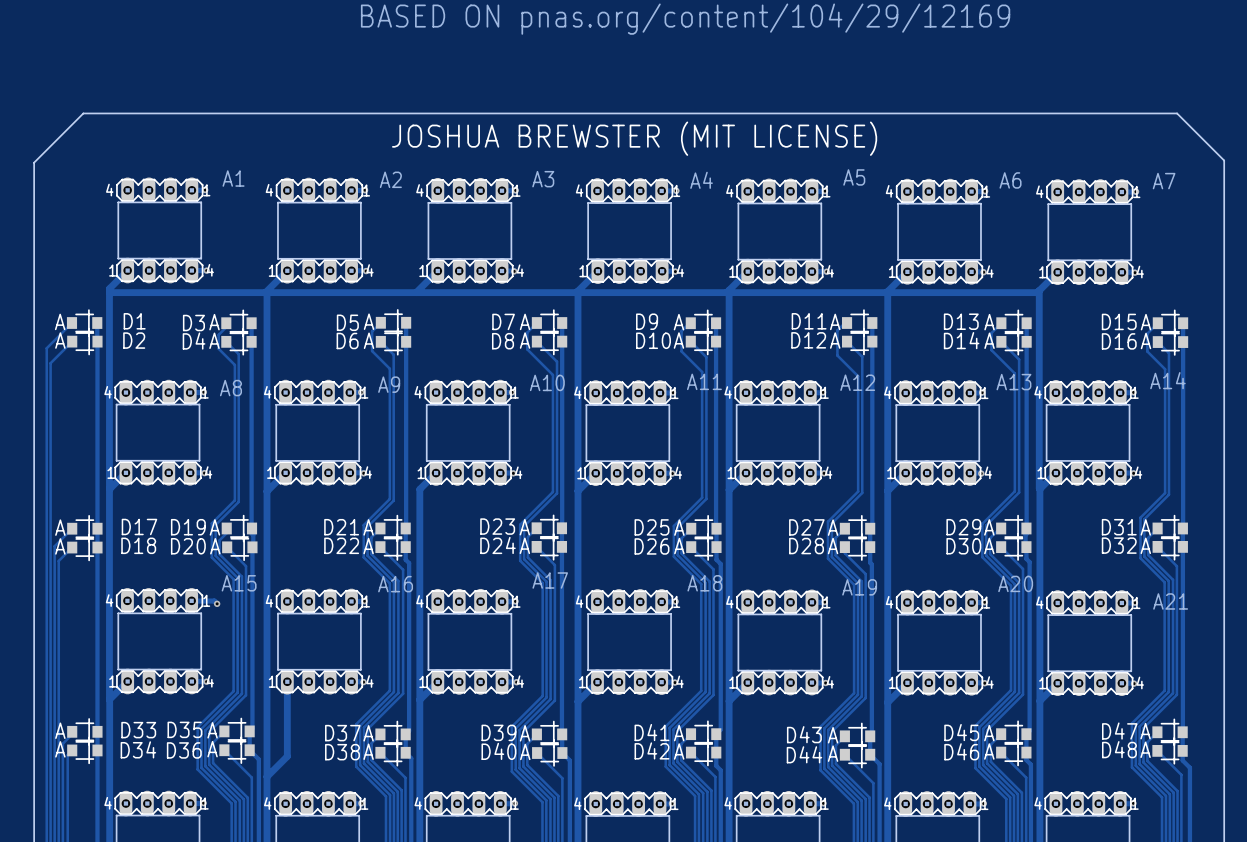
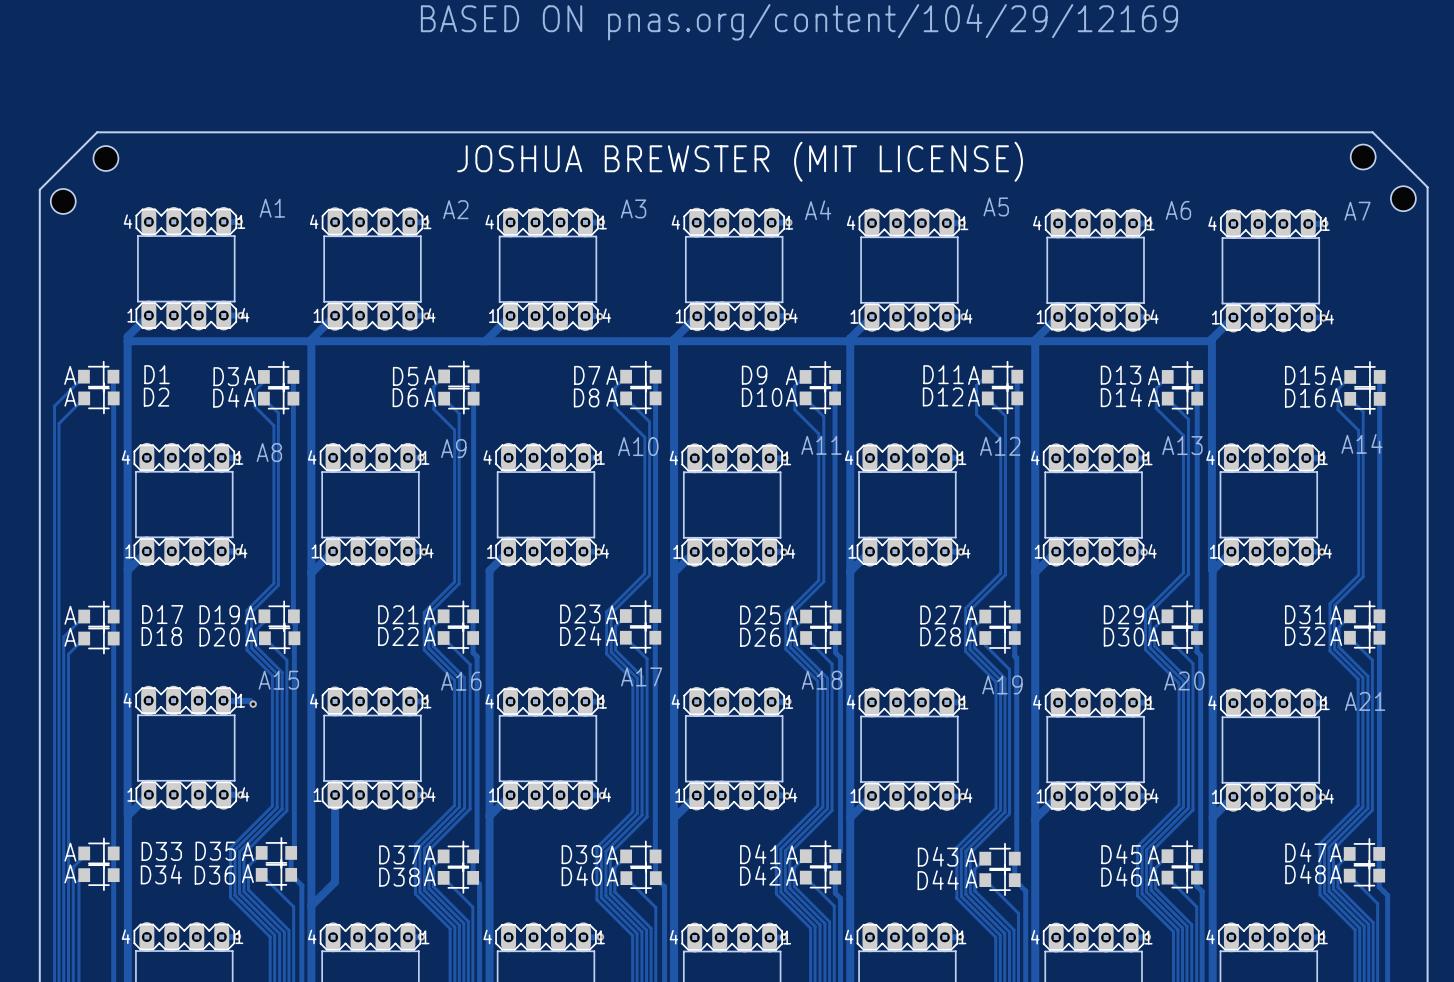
hole: none -> (1363, 157)
hole: none -> (105, 158)
hole: none -> (1403, 198)
hole: none -> (63, 201)

